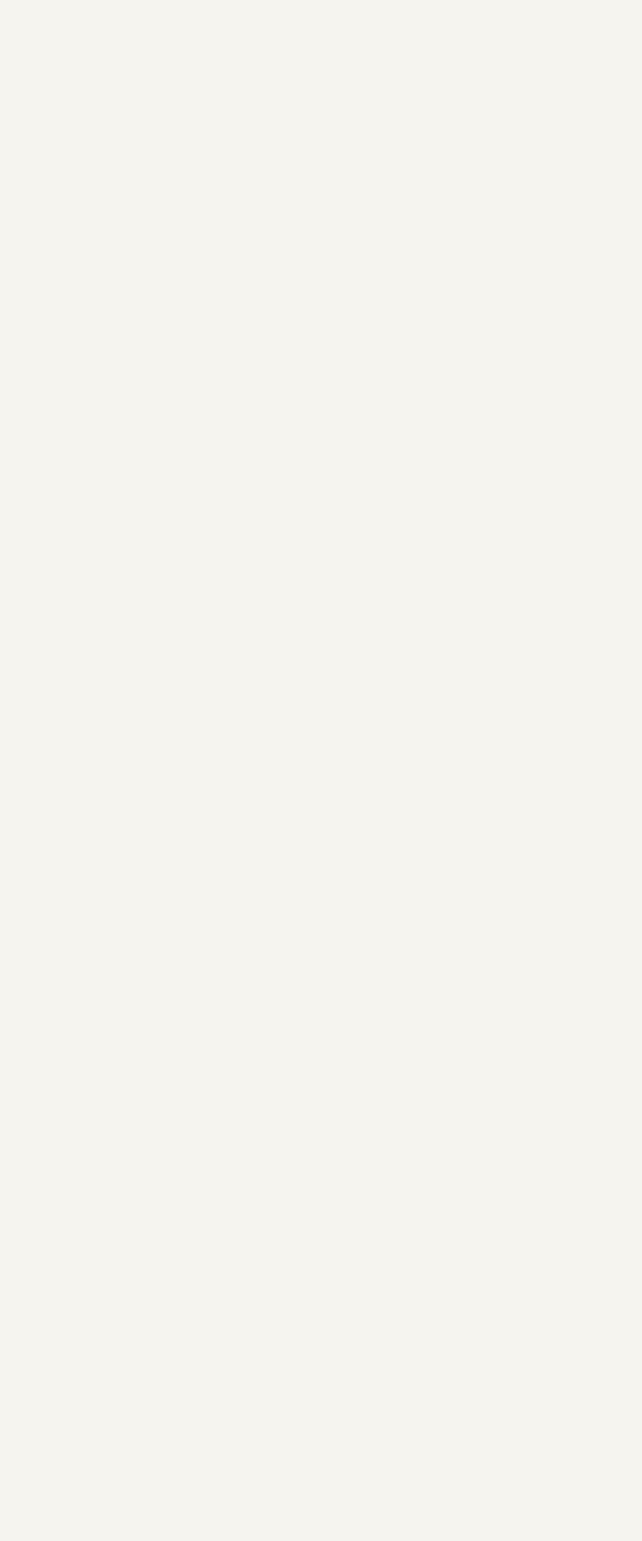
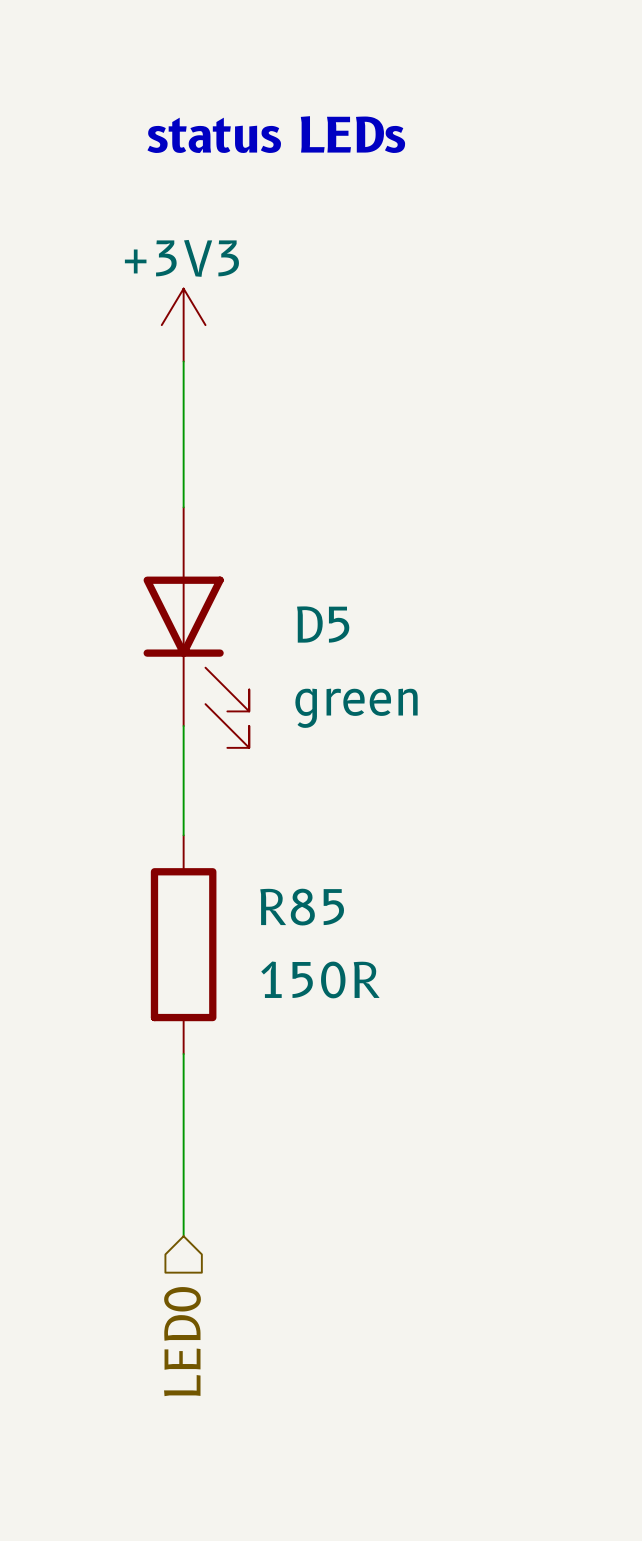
text: none -> status LEDs (276, 134)
power symbol: none -> +3V3 (183, 325)
wire: none -> (183, 361) (183, 507)
D5: none -> green (196, 627)
wire: none -> (183, 725) (183, 835)
R85: none -> 150R (183, 944)
wire: none -> (183, 1053) (183, 1236)
hierarchical label: none -> LED0 (182, 1341)

